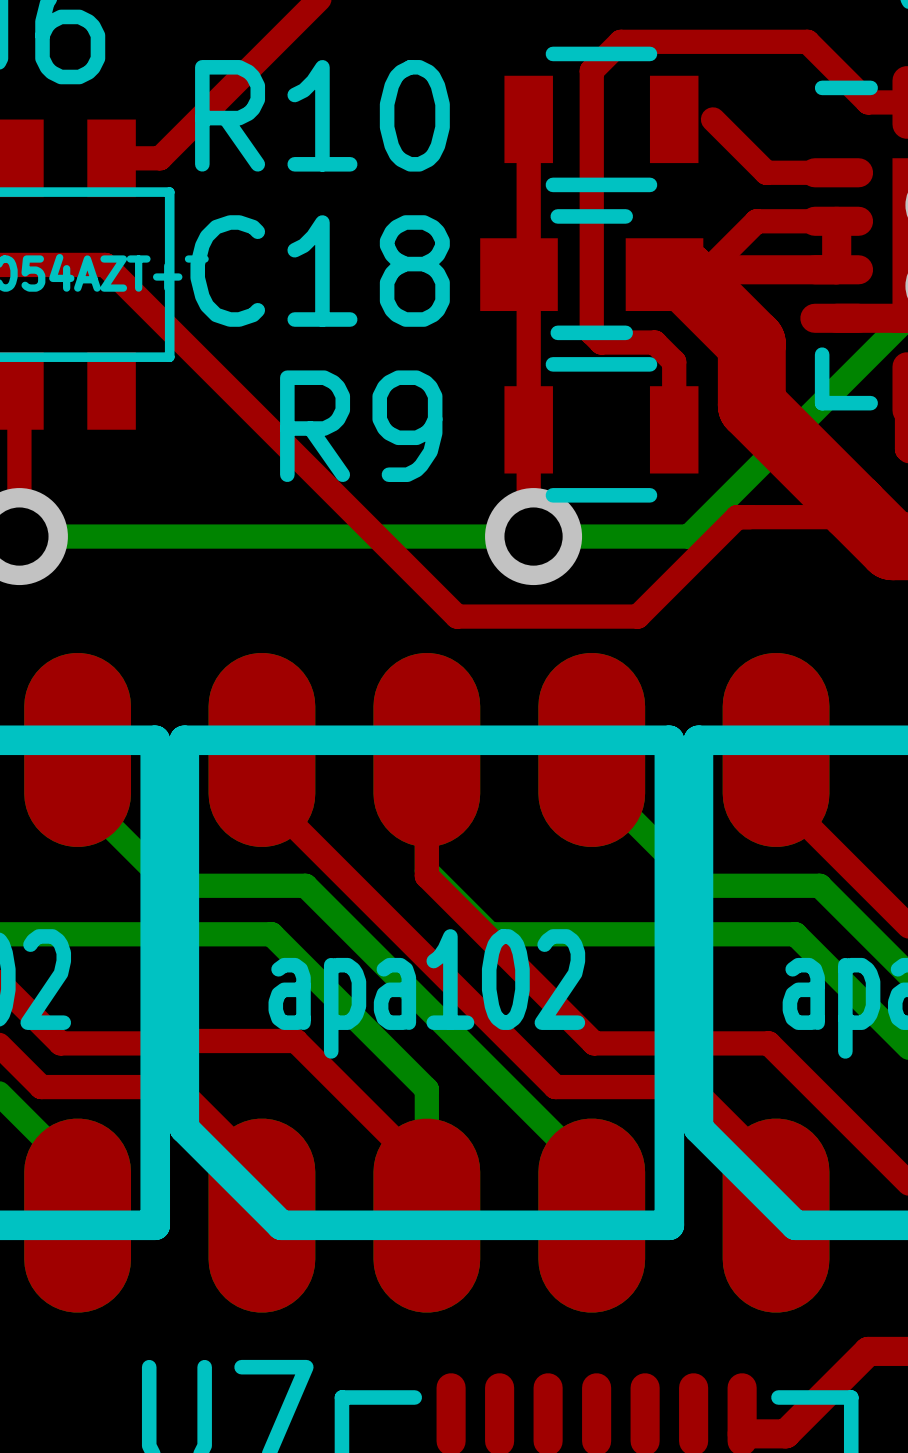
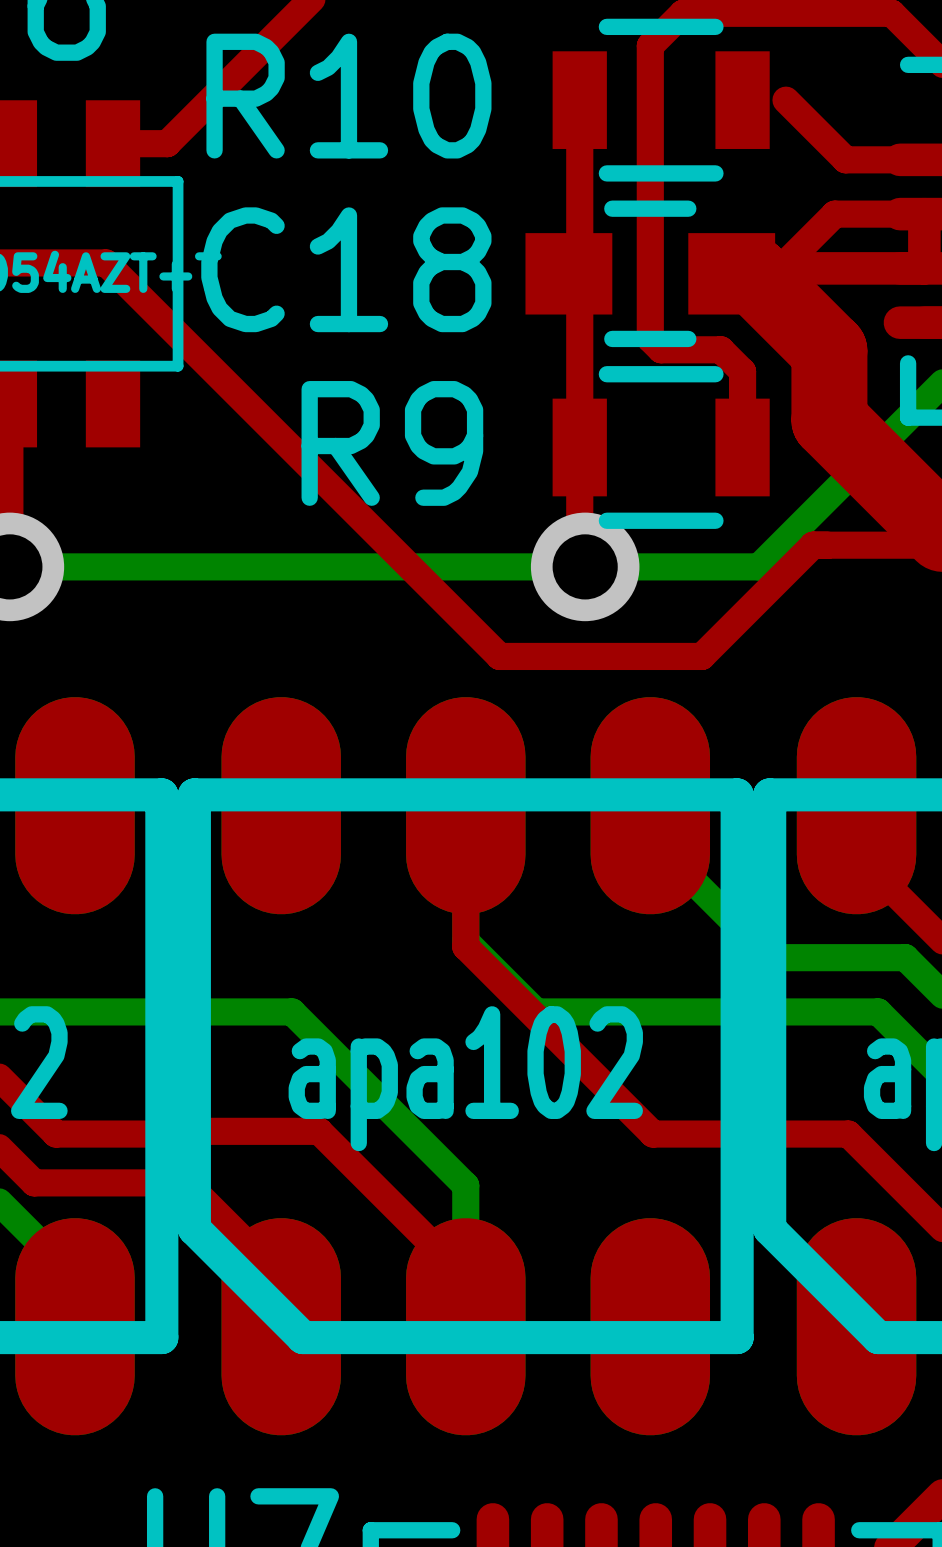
bottom track: (77, 749) (77, 793) (169, 885) (305, 885) (591, 1171) (591, 1215) -> none
top track: (261, 749) (261, 793) (555, 1087) (691, 1087) (776, 1171) (776, 1215) -> none

